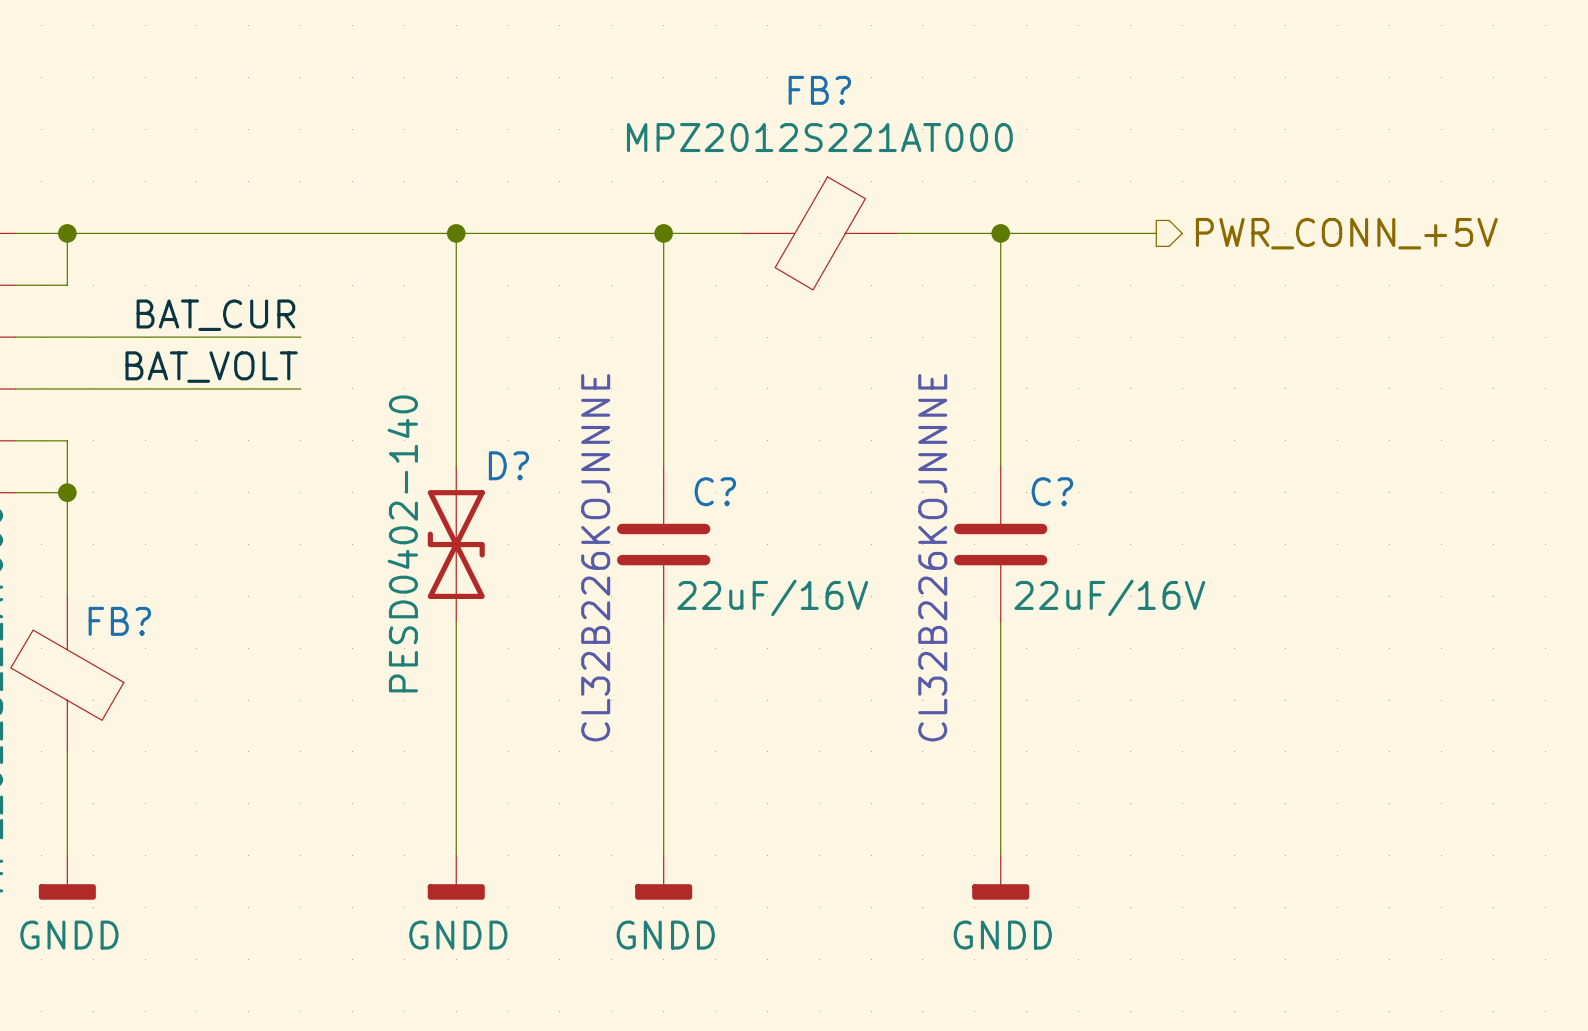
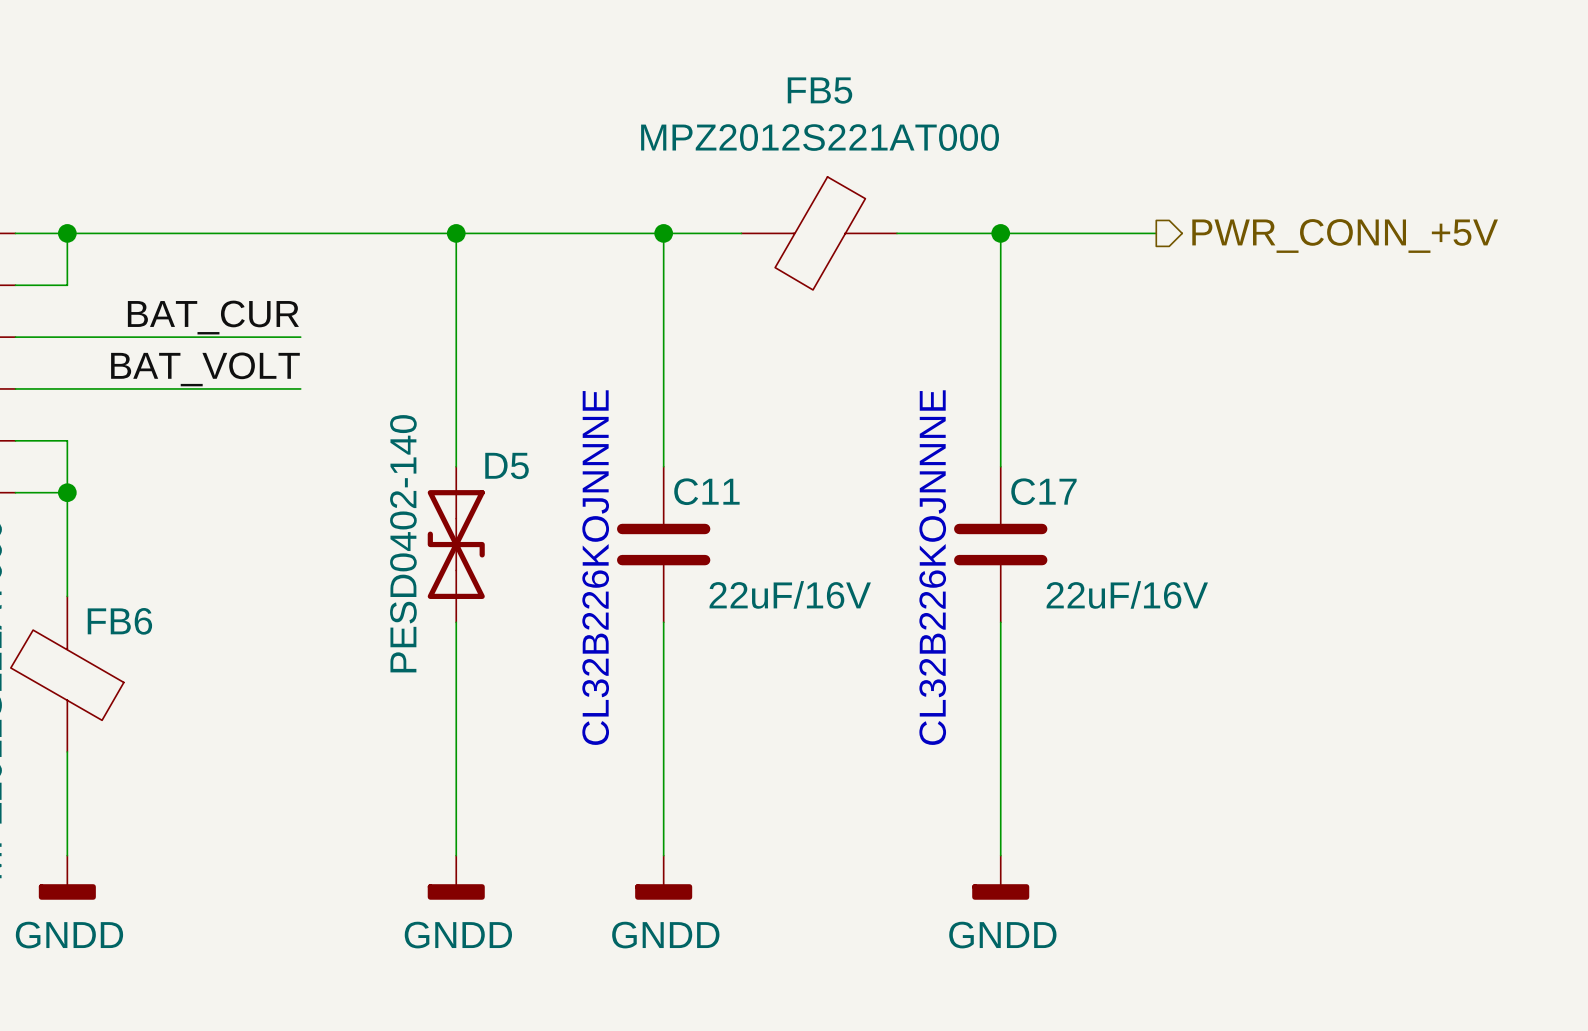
FB? name: FB? (819, 90) -> FB5 (819, 90)
D? name: D? (508, 465) -> D5 (507, 465)
C? name: C? (715, 491) -> C11 (706, 491)
C? name: C? (1052, 491) -> C17 (1043, 491)
FB? name: FB? (119, 621) -> FB6 (119, 621)

